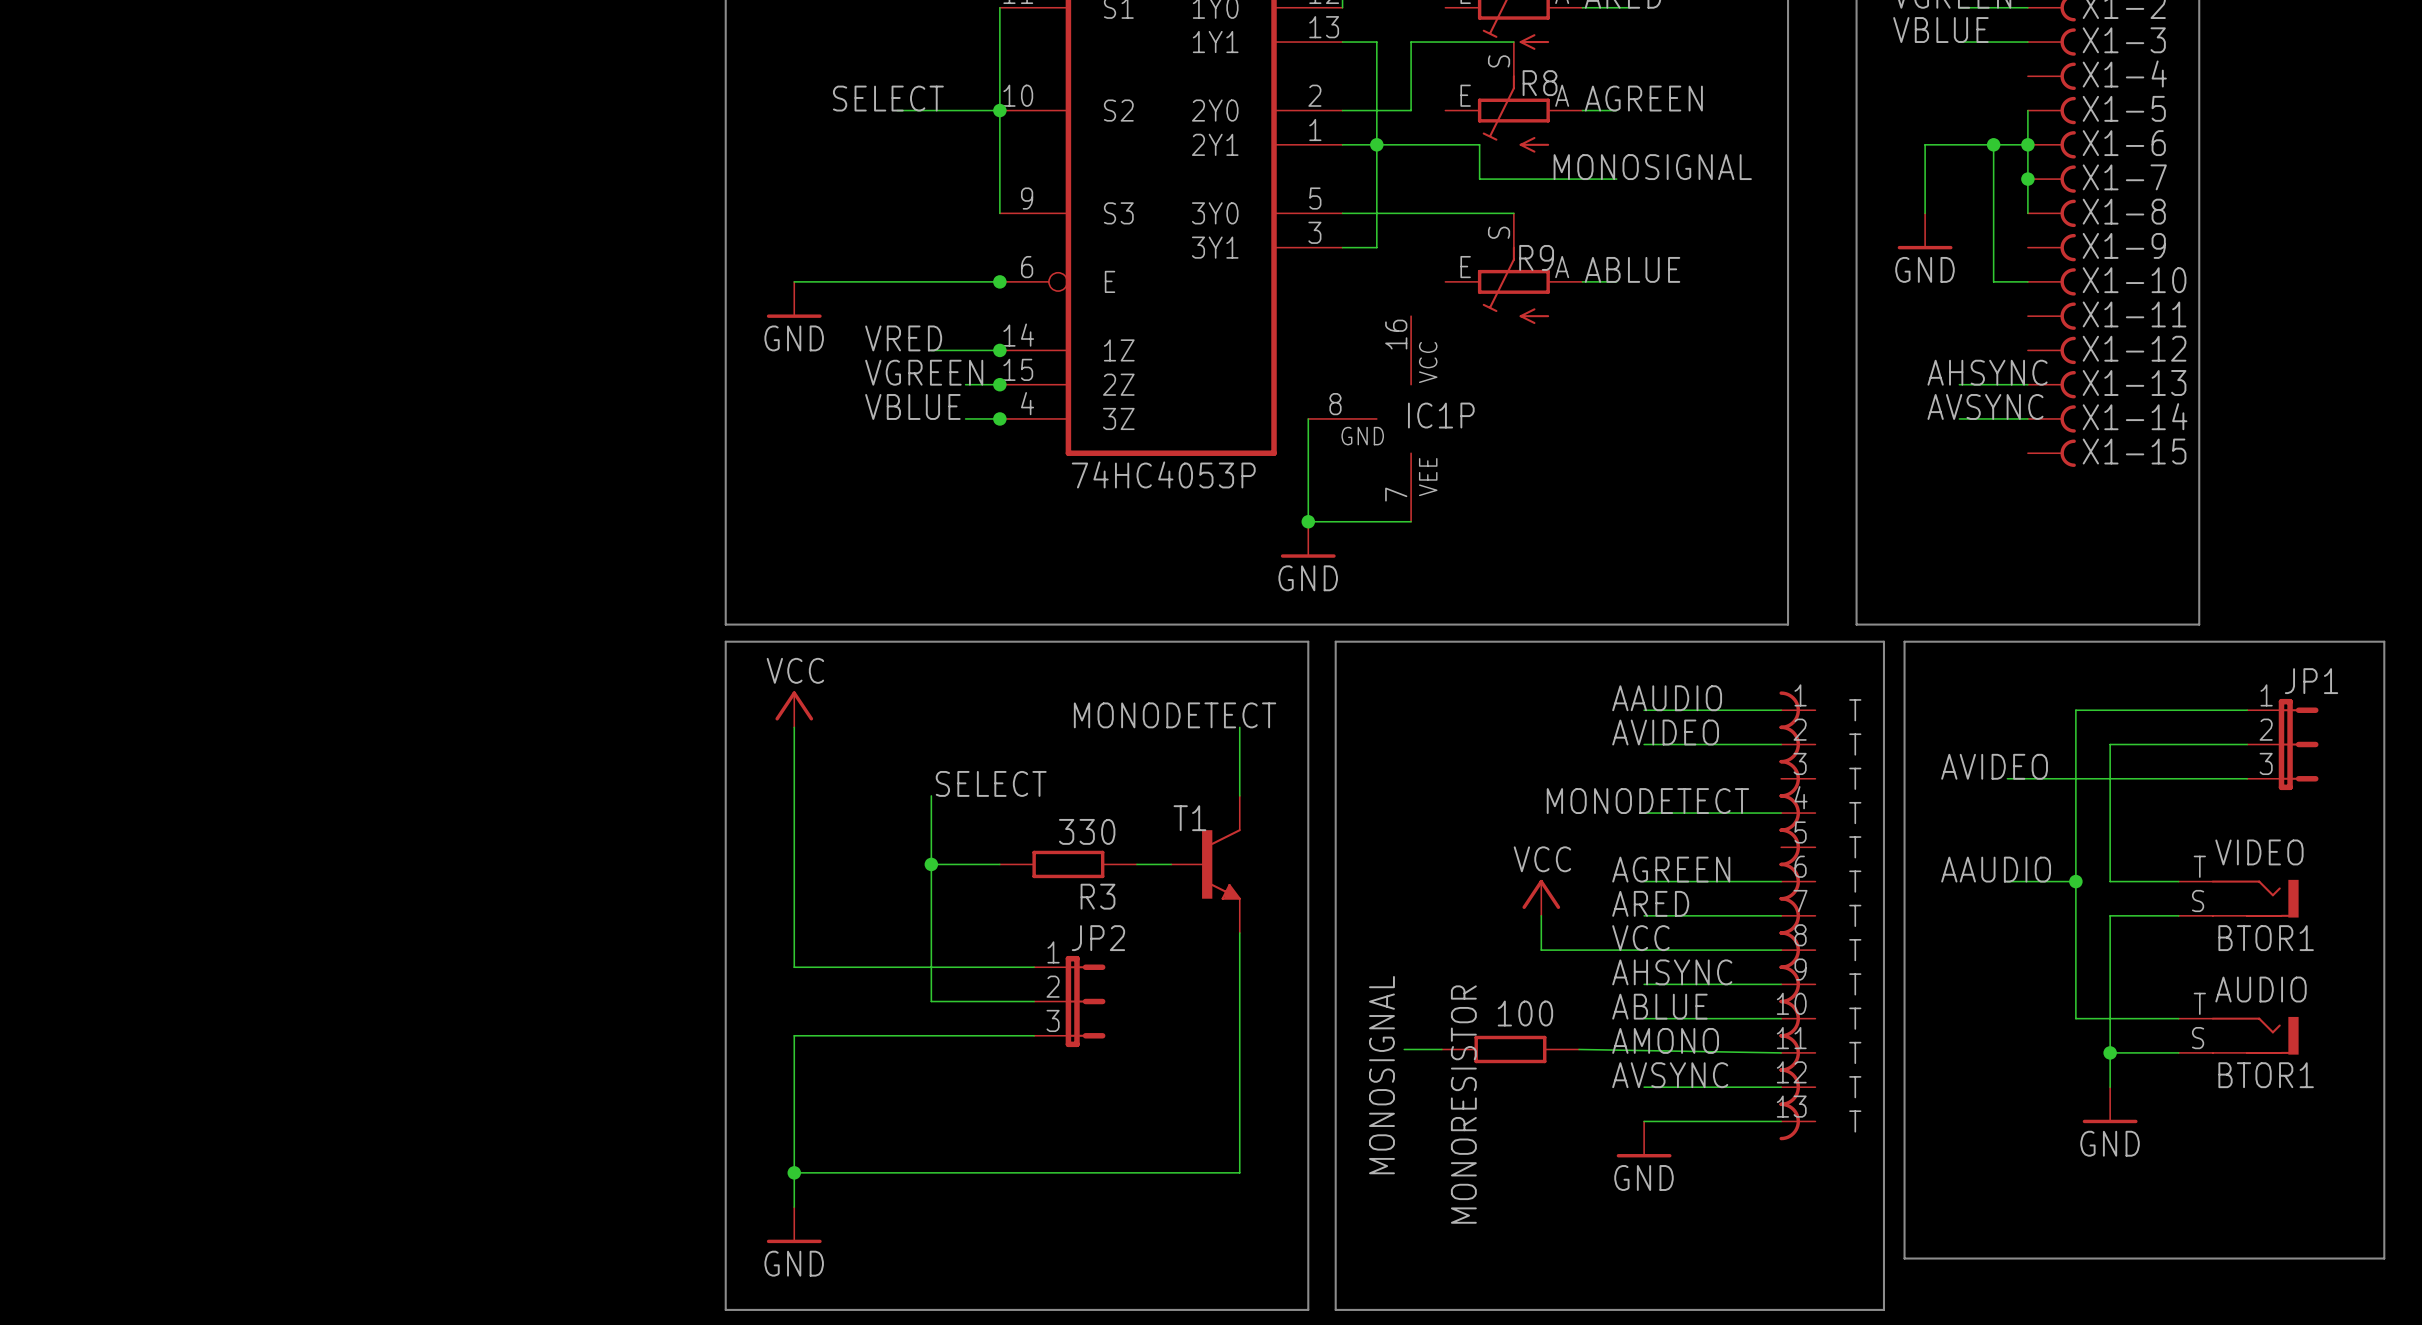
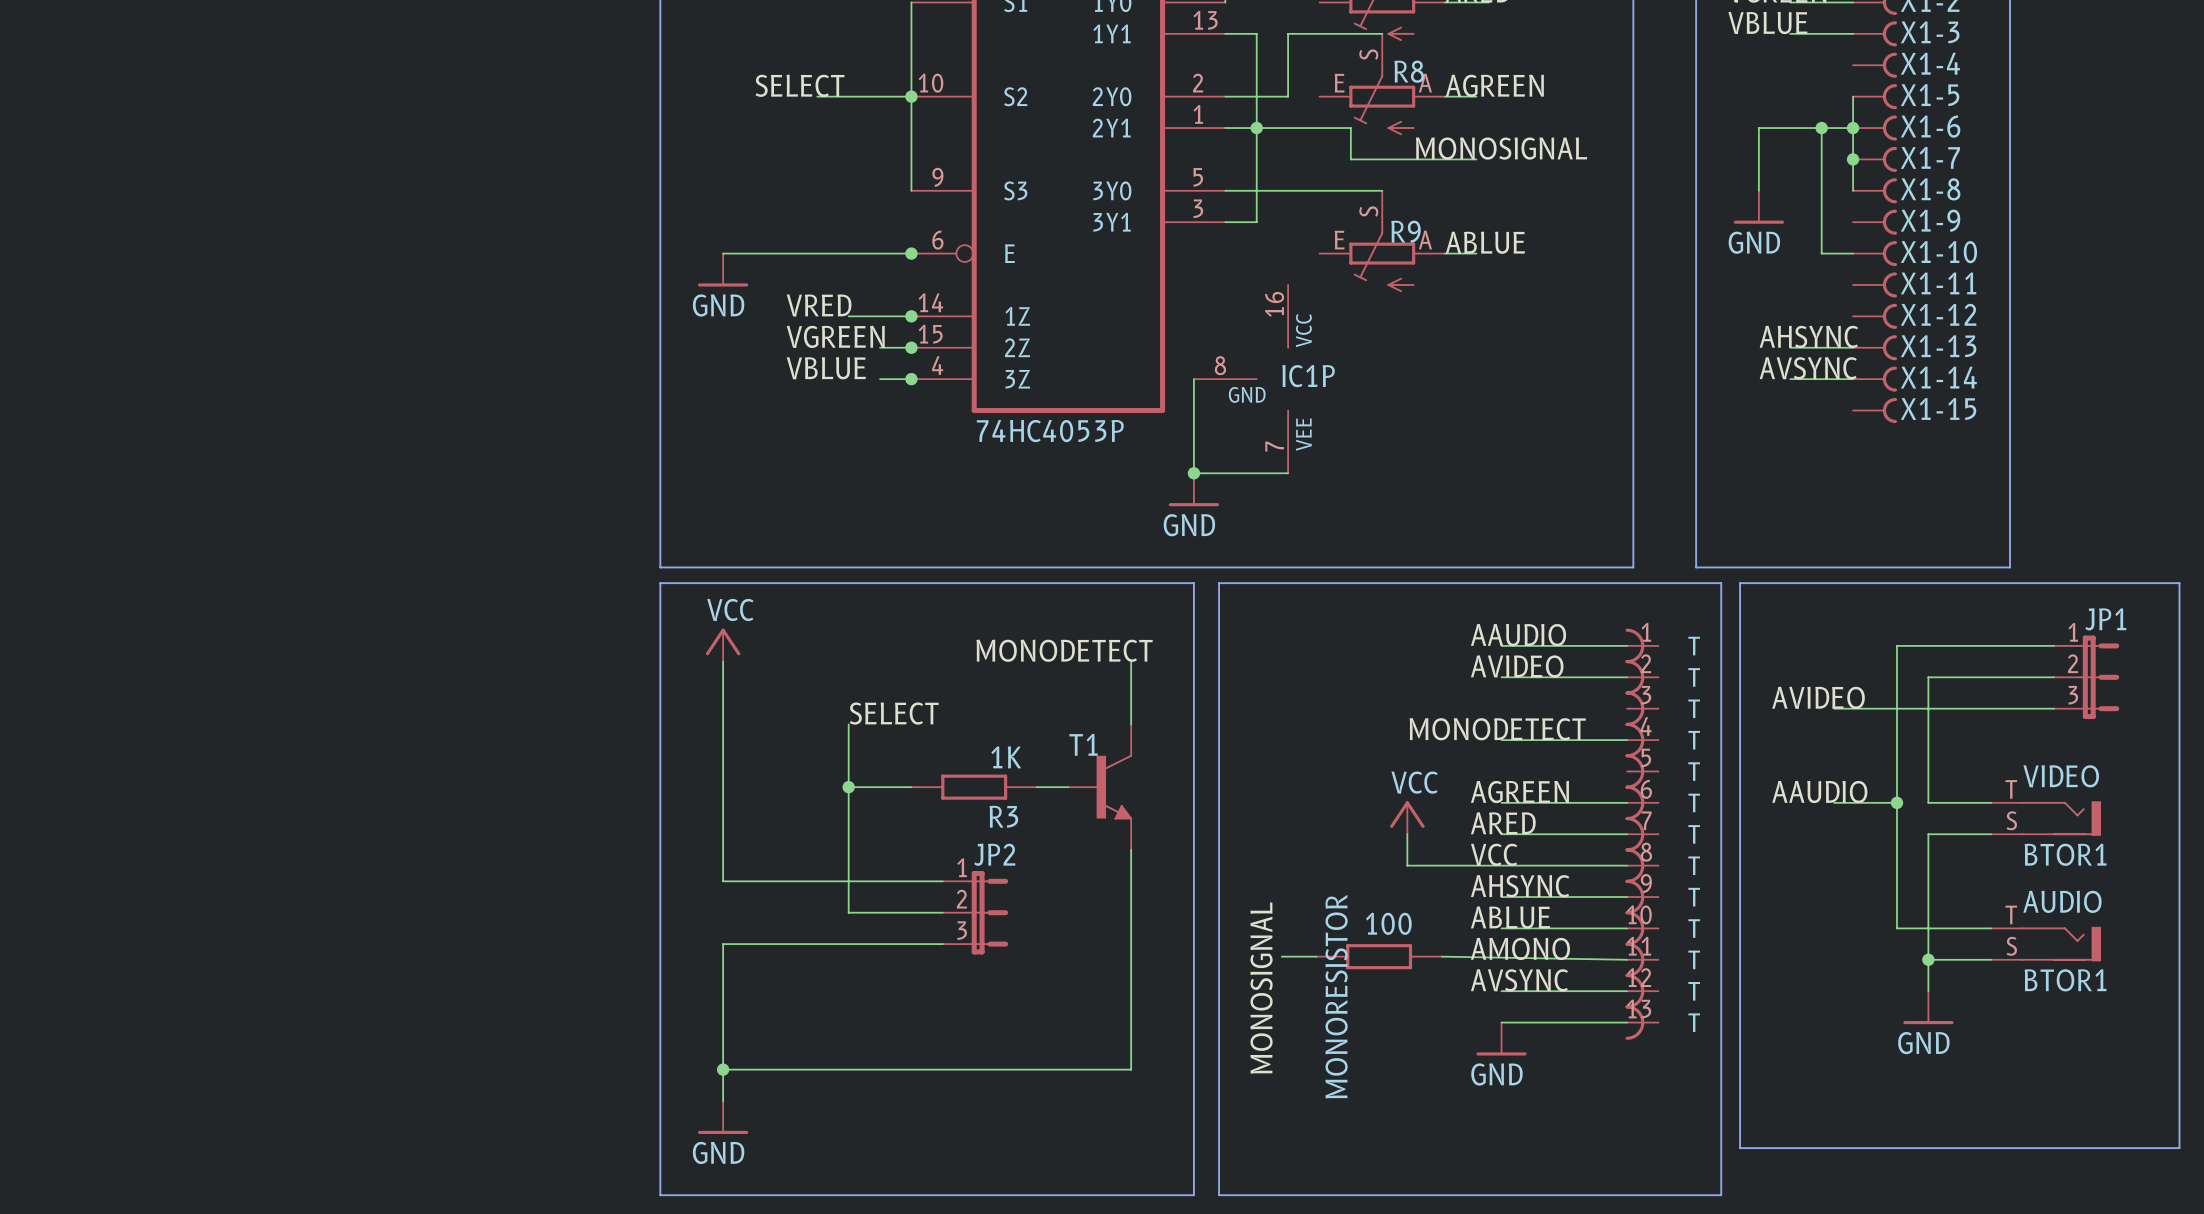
R3 value: 330 (1087, 831) -> 1K (1006, 757)

